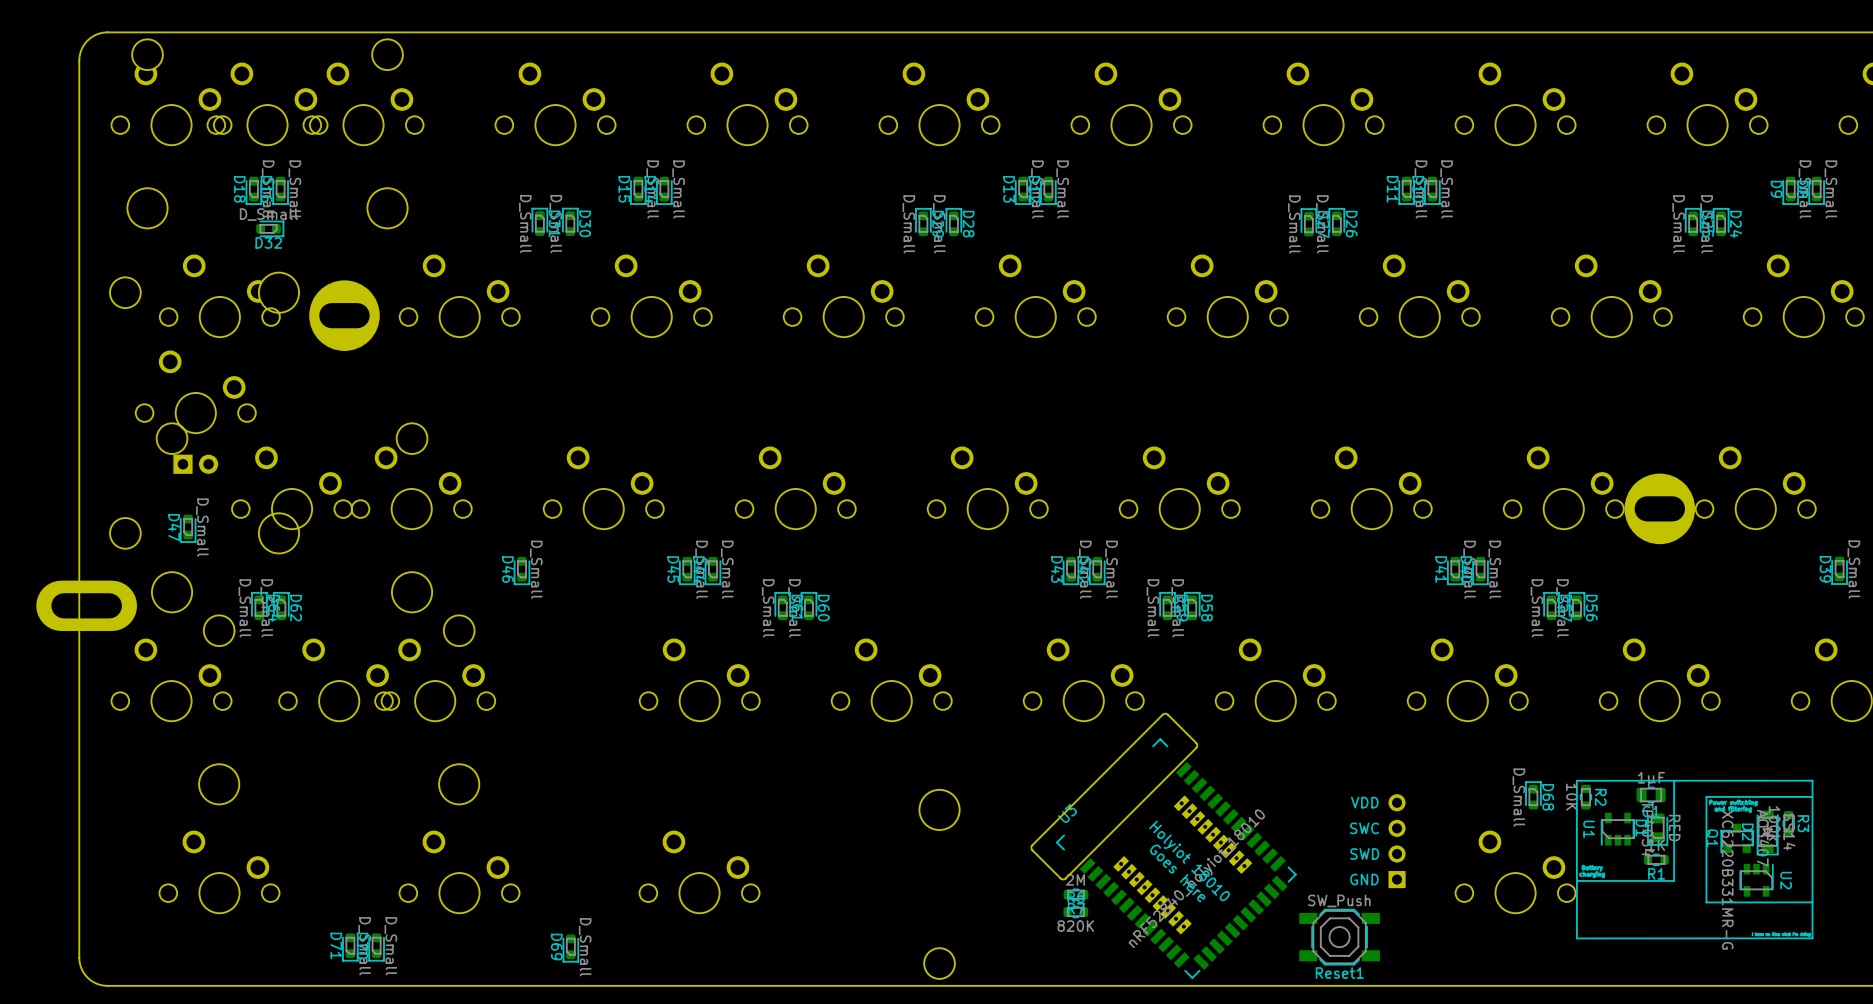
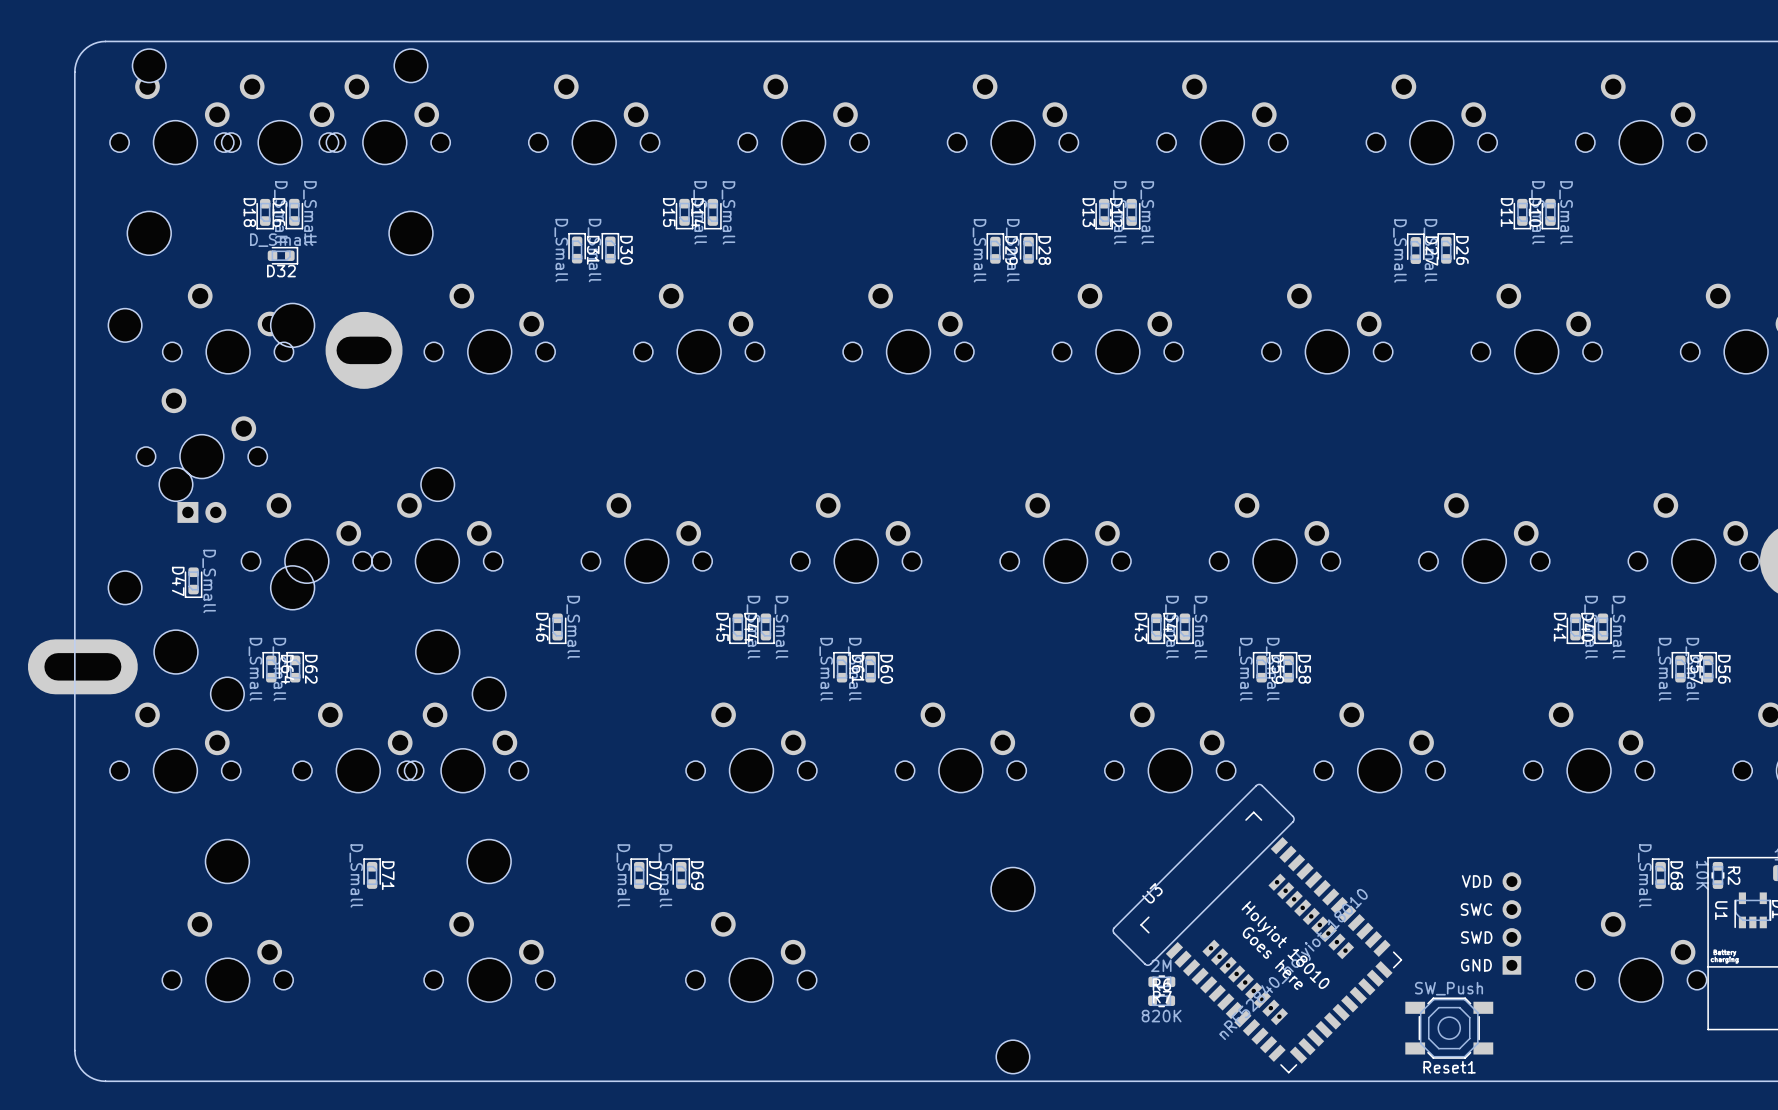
D71 rotation: 0° (350, 947) -> 180° (372, 873)
D71 position: (350, 947) -> (372, 873)
D70 rotation: 0° (376, 947) -> 180° (639, 873)
D70 position: (376, 947) -> (639, 873)
D69 rotation: 0° (570, 948) -> 180° (681, 873)
D69 position: (570, 948) -> (681, 873)

